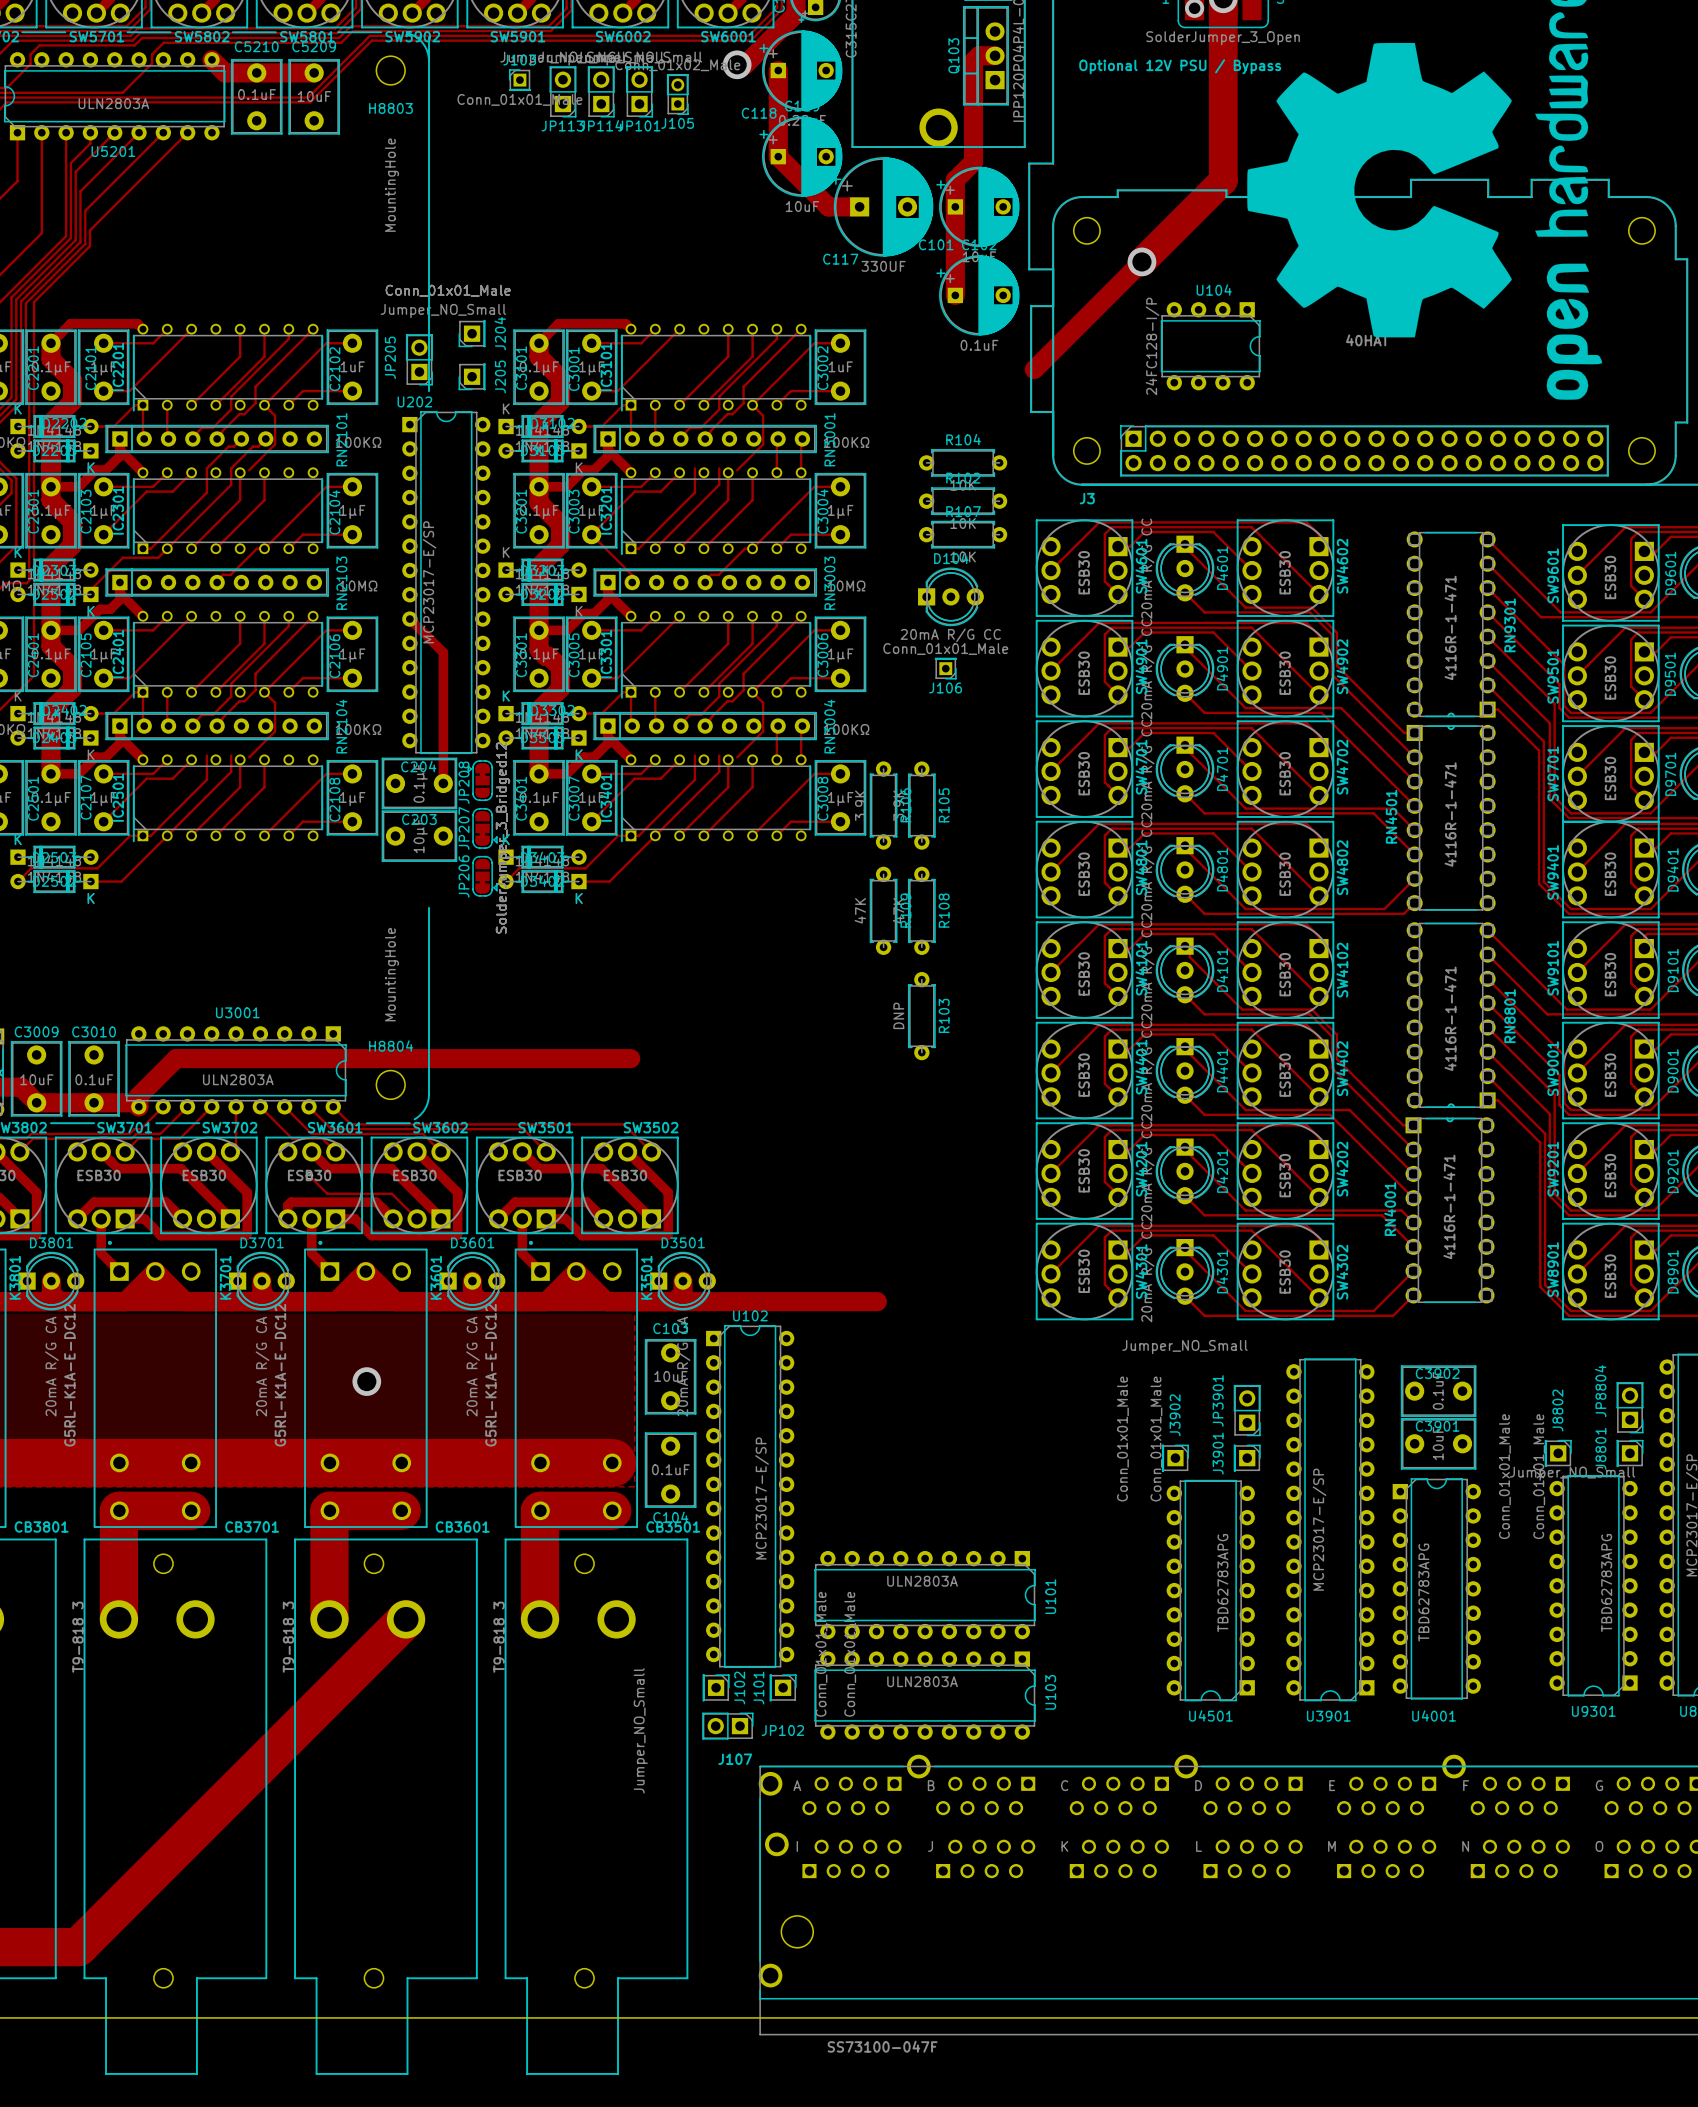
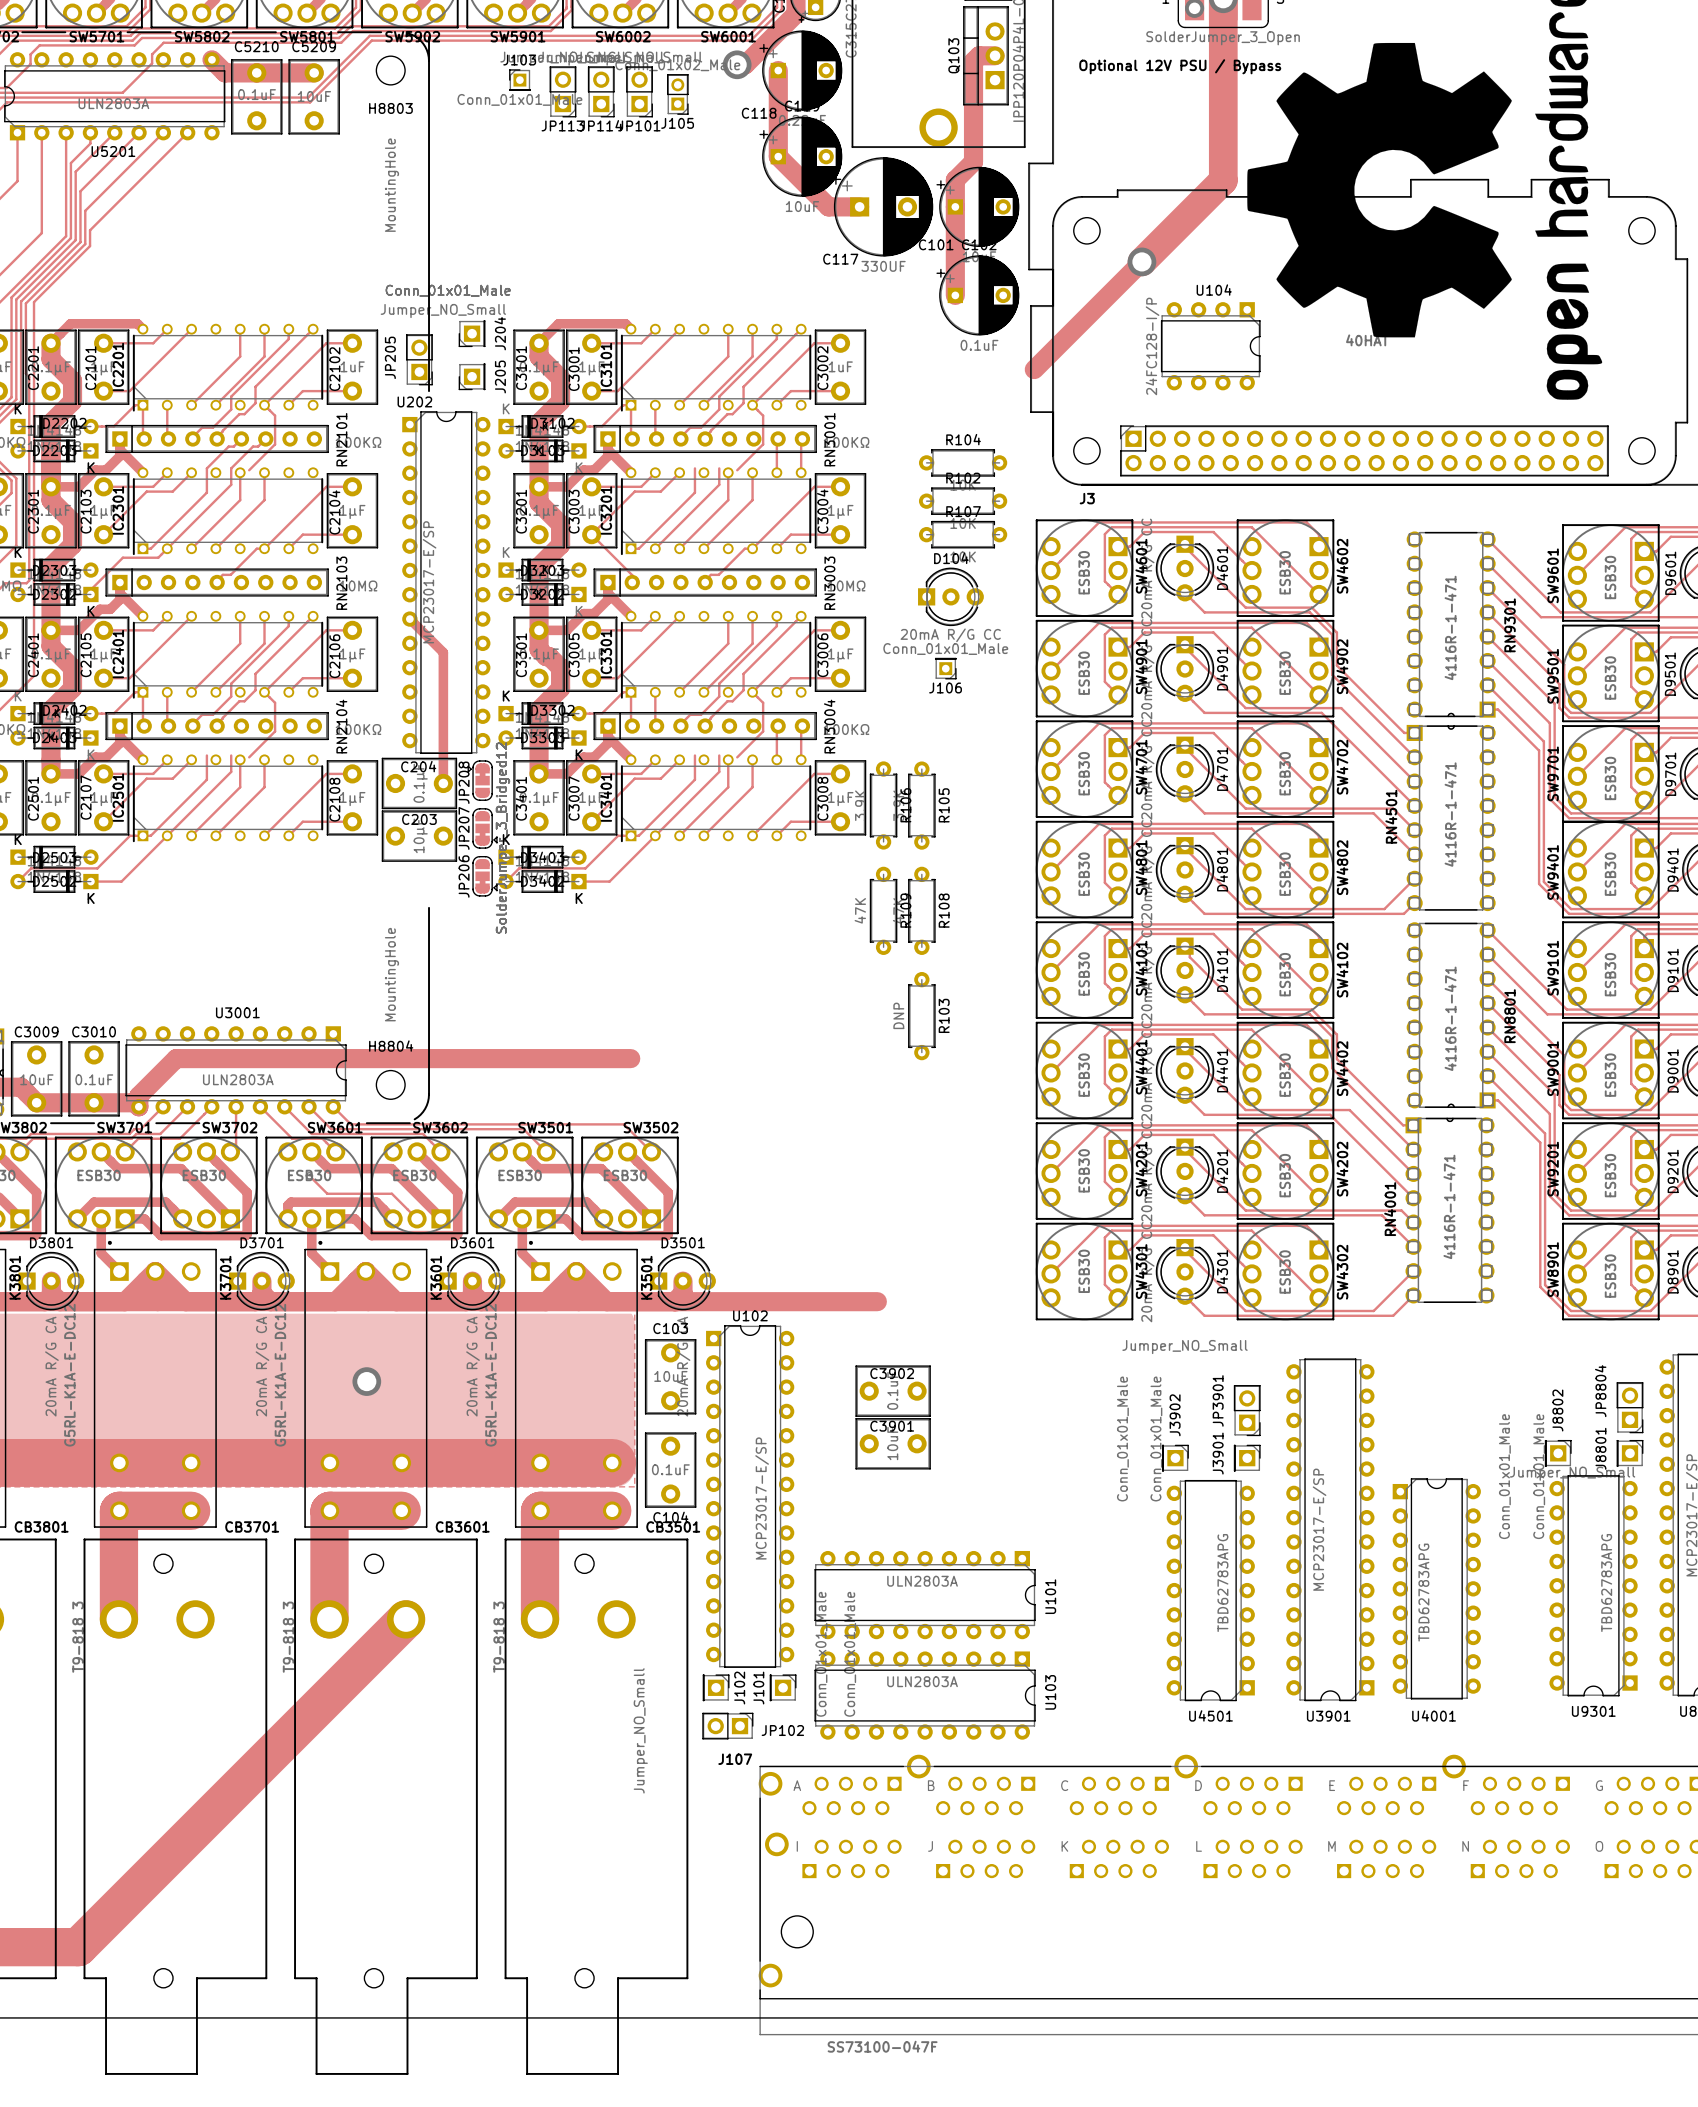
C3902 position: (1438, 1391) -> (893, 1391)
C3901 position: (1438, 1443) -> (893, 1443)

